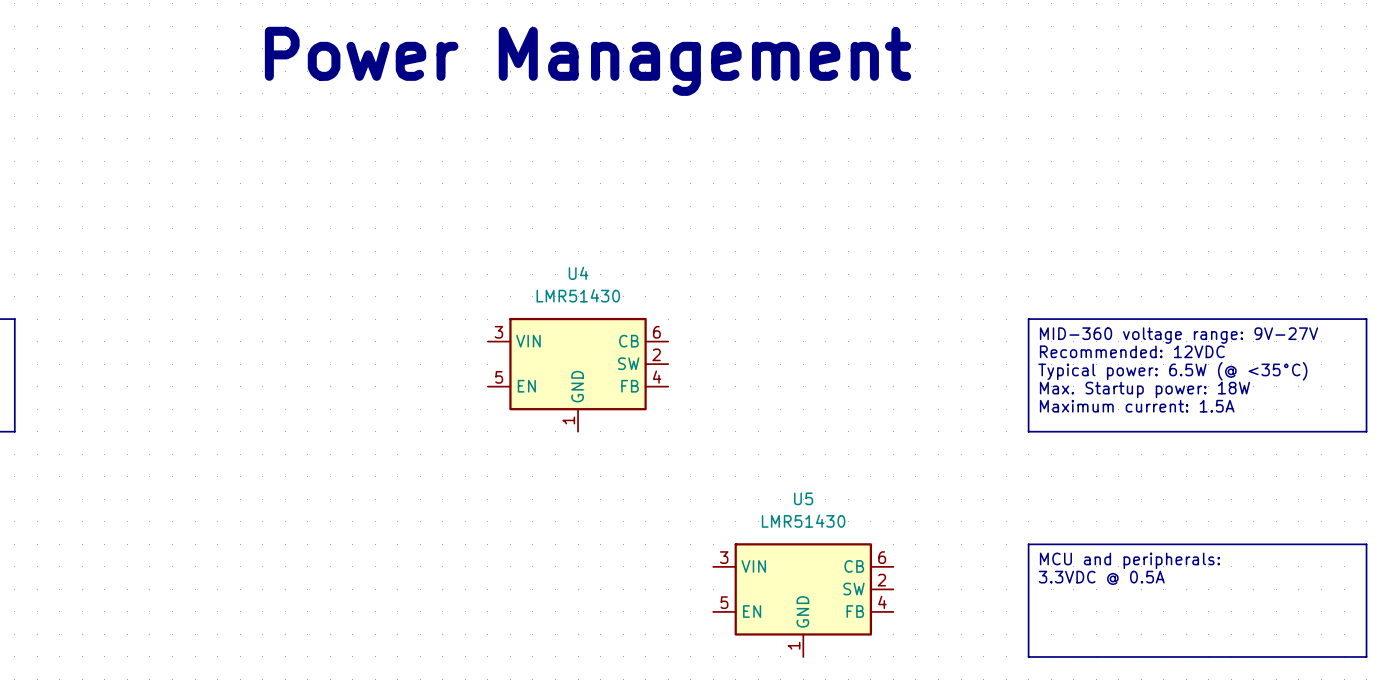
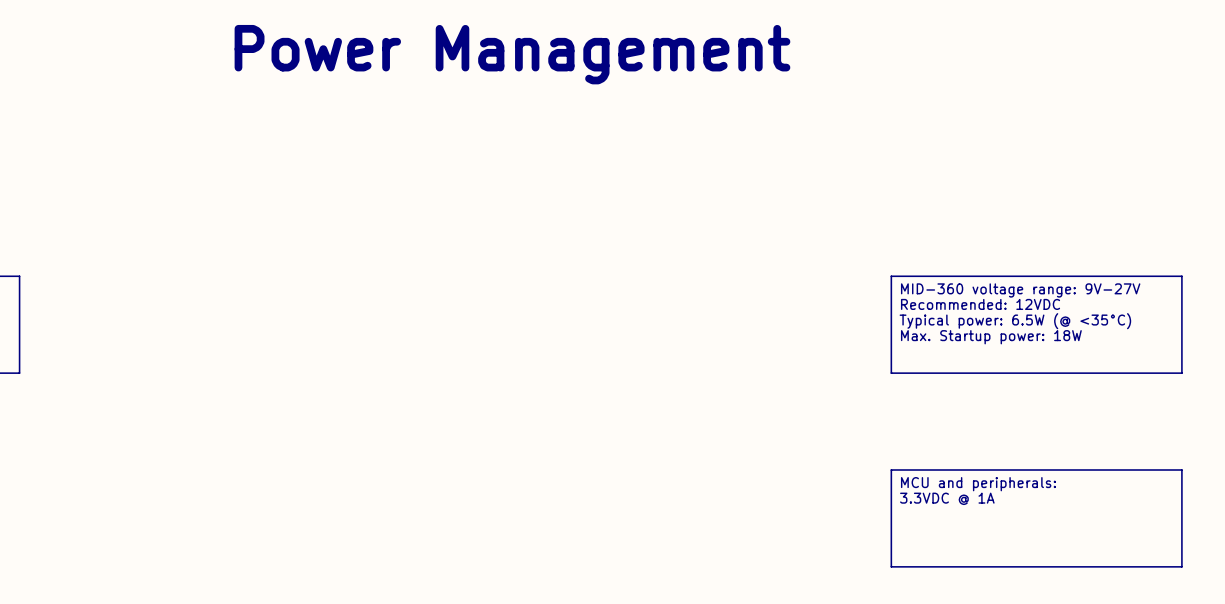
U4: LMR51430 (578, 374) -> none
text: Maximum current: 1.5A (1137, 406) -> none
text: 3.3VDC @ 0.5A (1101, 577) -> 3.3VDC @ 1A (947, 498)
U5: LMR51430 (803, 600) -> none

